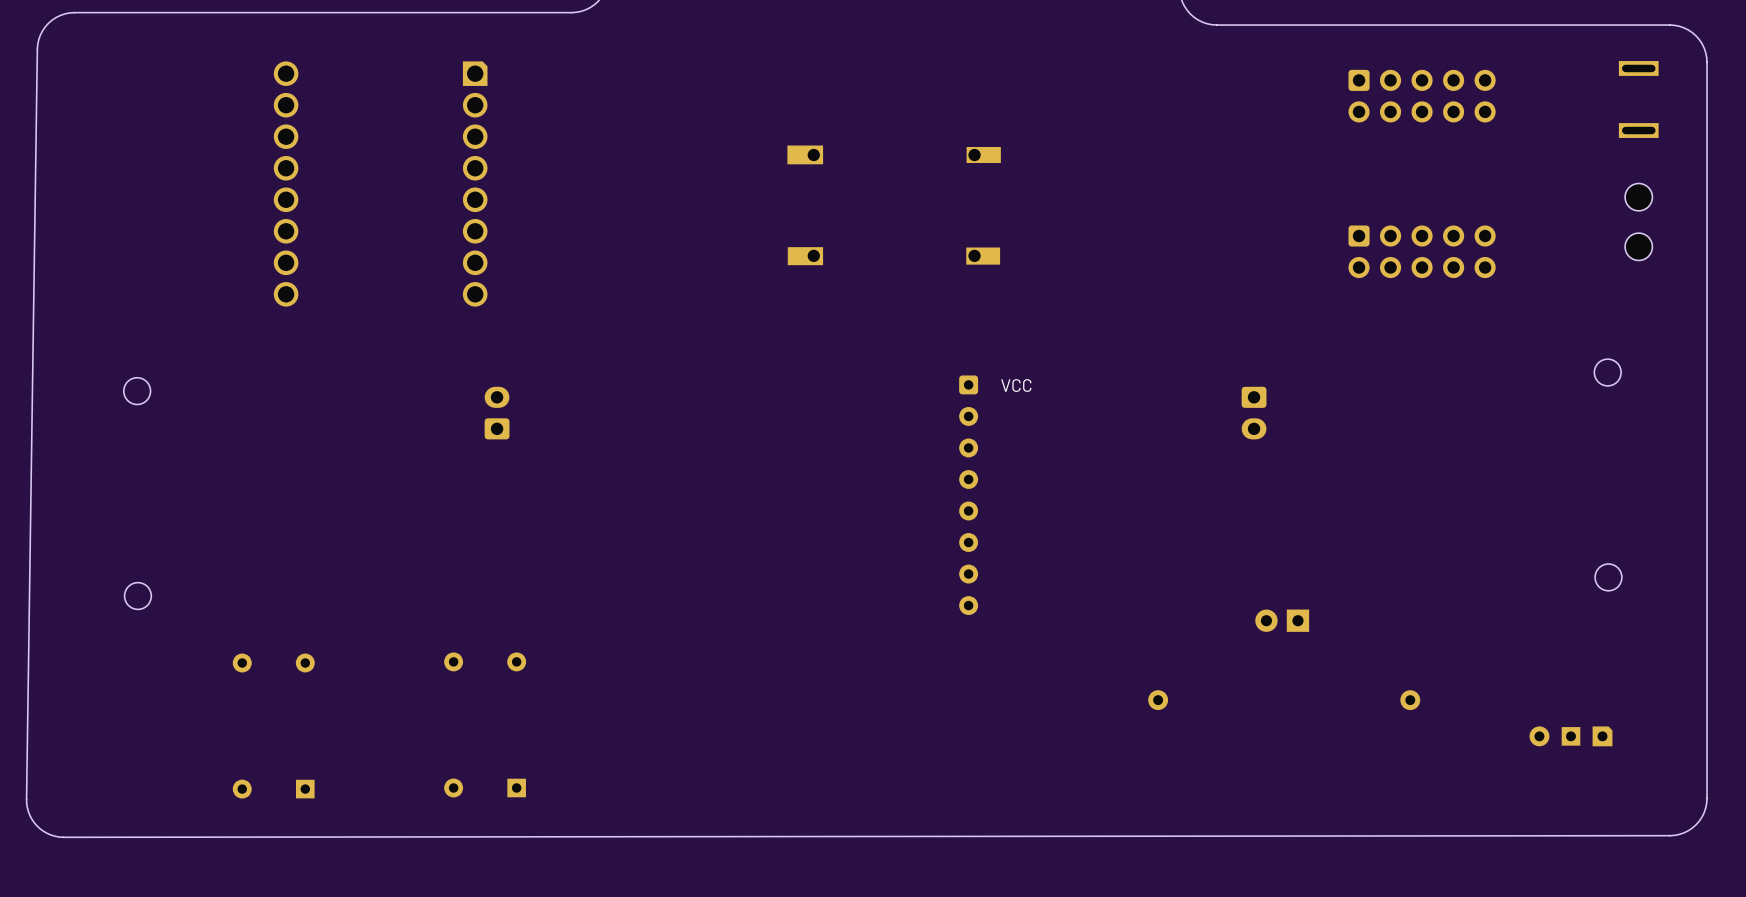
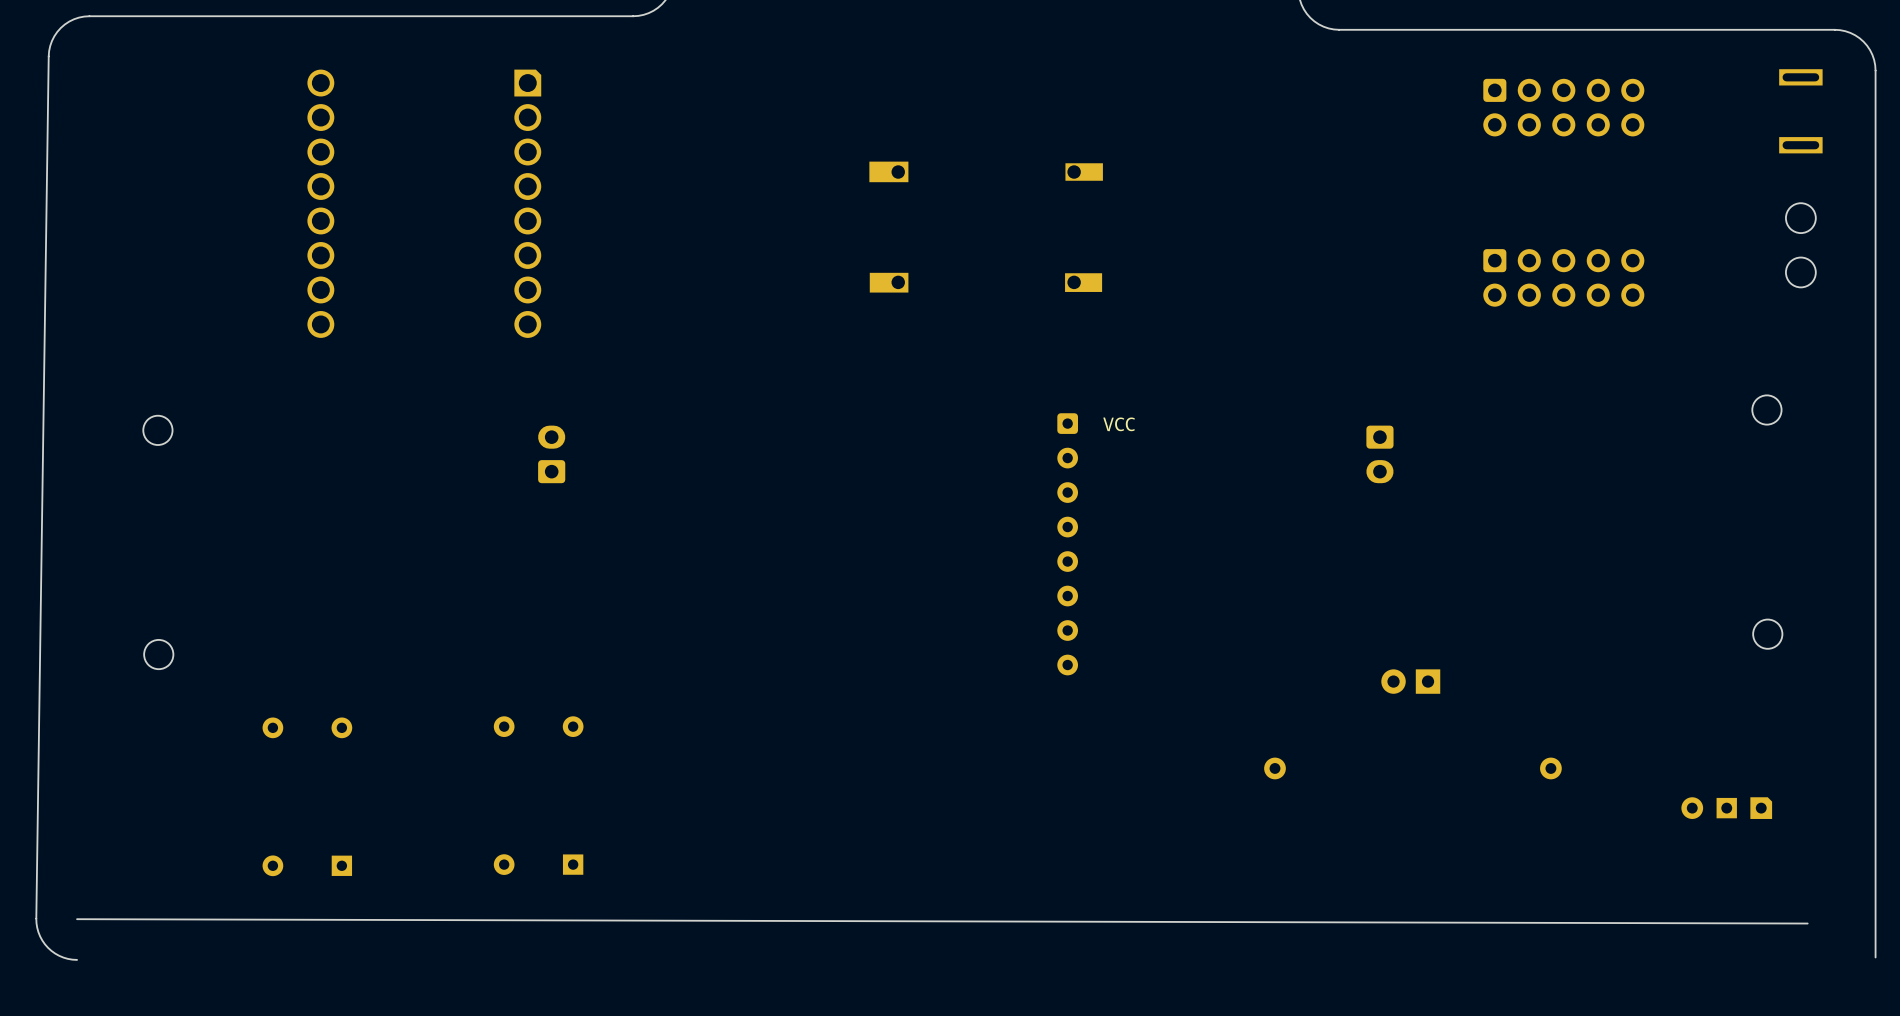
board edge: (1707, 798) (1704, 812) (1696, 824) (1684, 832) (1669, 835) (63, 837) (51, 835) (37, 826) (28, 811) (26, 799) -> (77, 959) (67, 958) (55, 953) (48, 947) (40, 936) (36, 923) (36, 877)
board edge: none -> (1875, 876) (1875, 957)
board edge: none -> (77, 919) (1807, 923)

